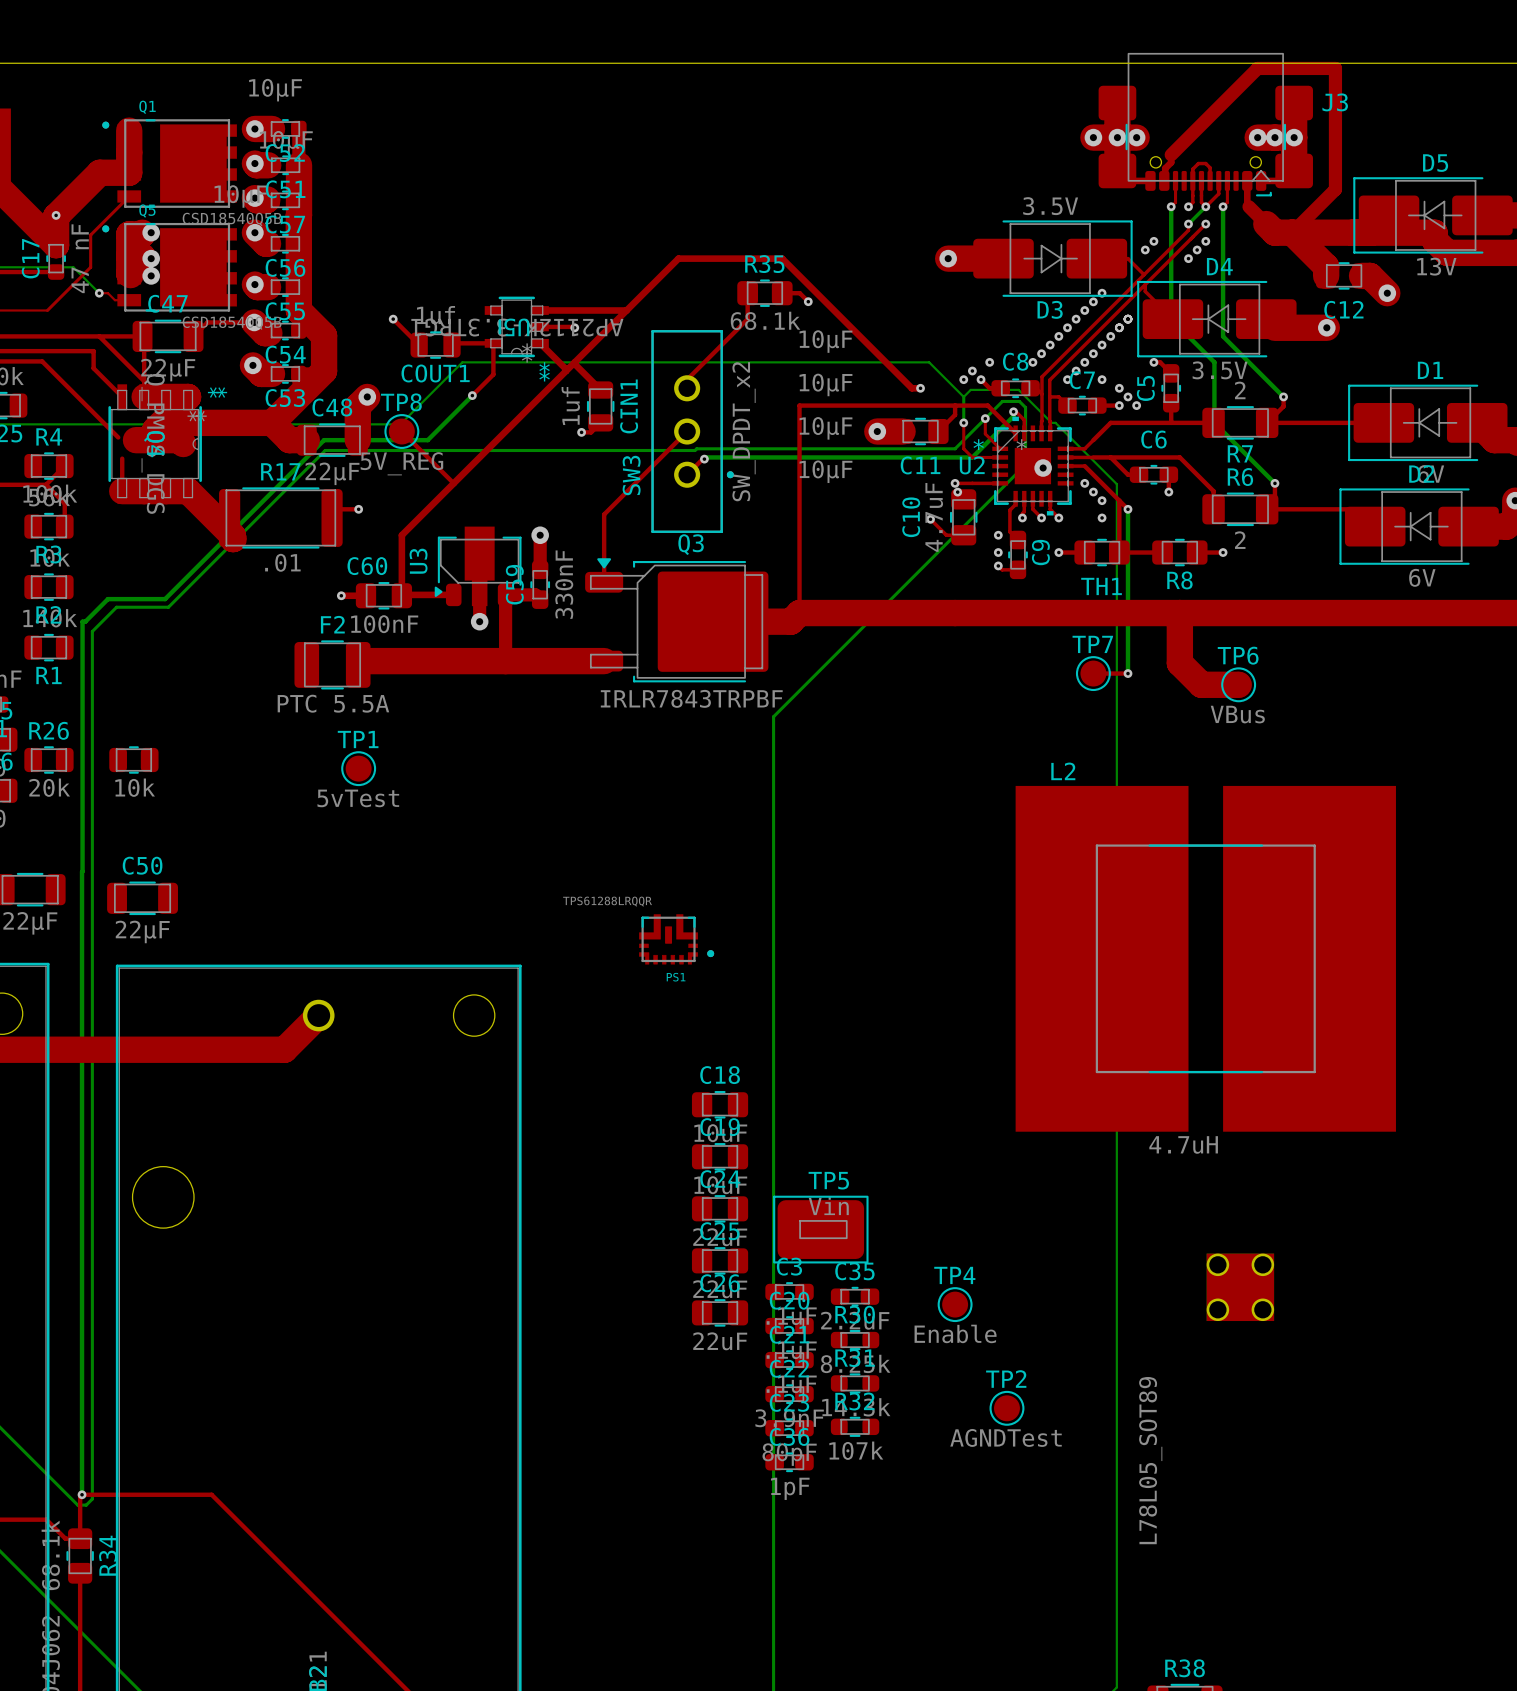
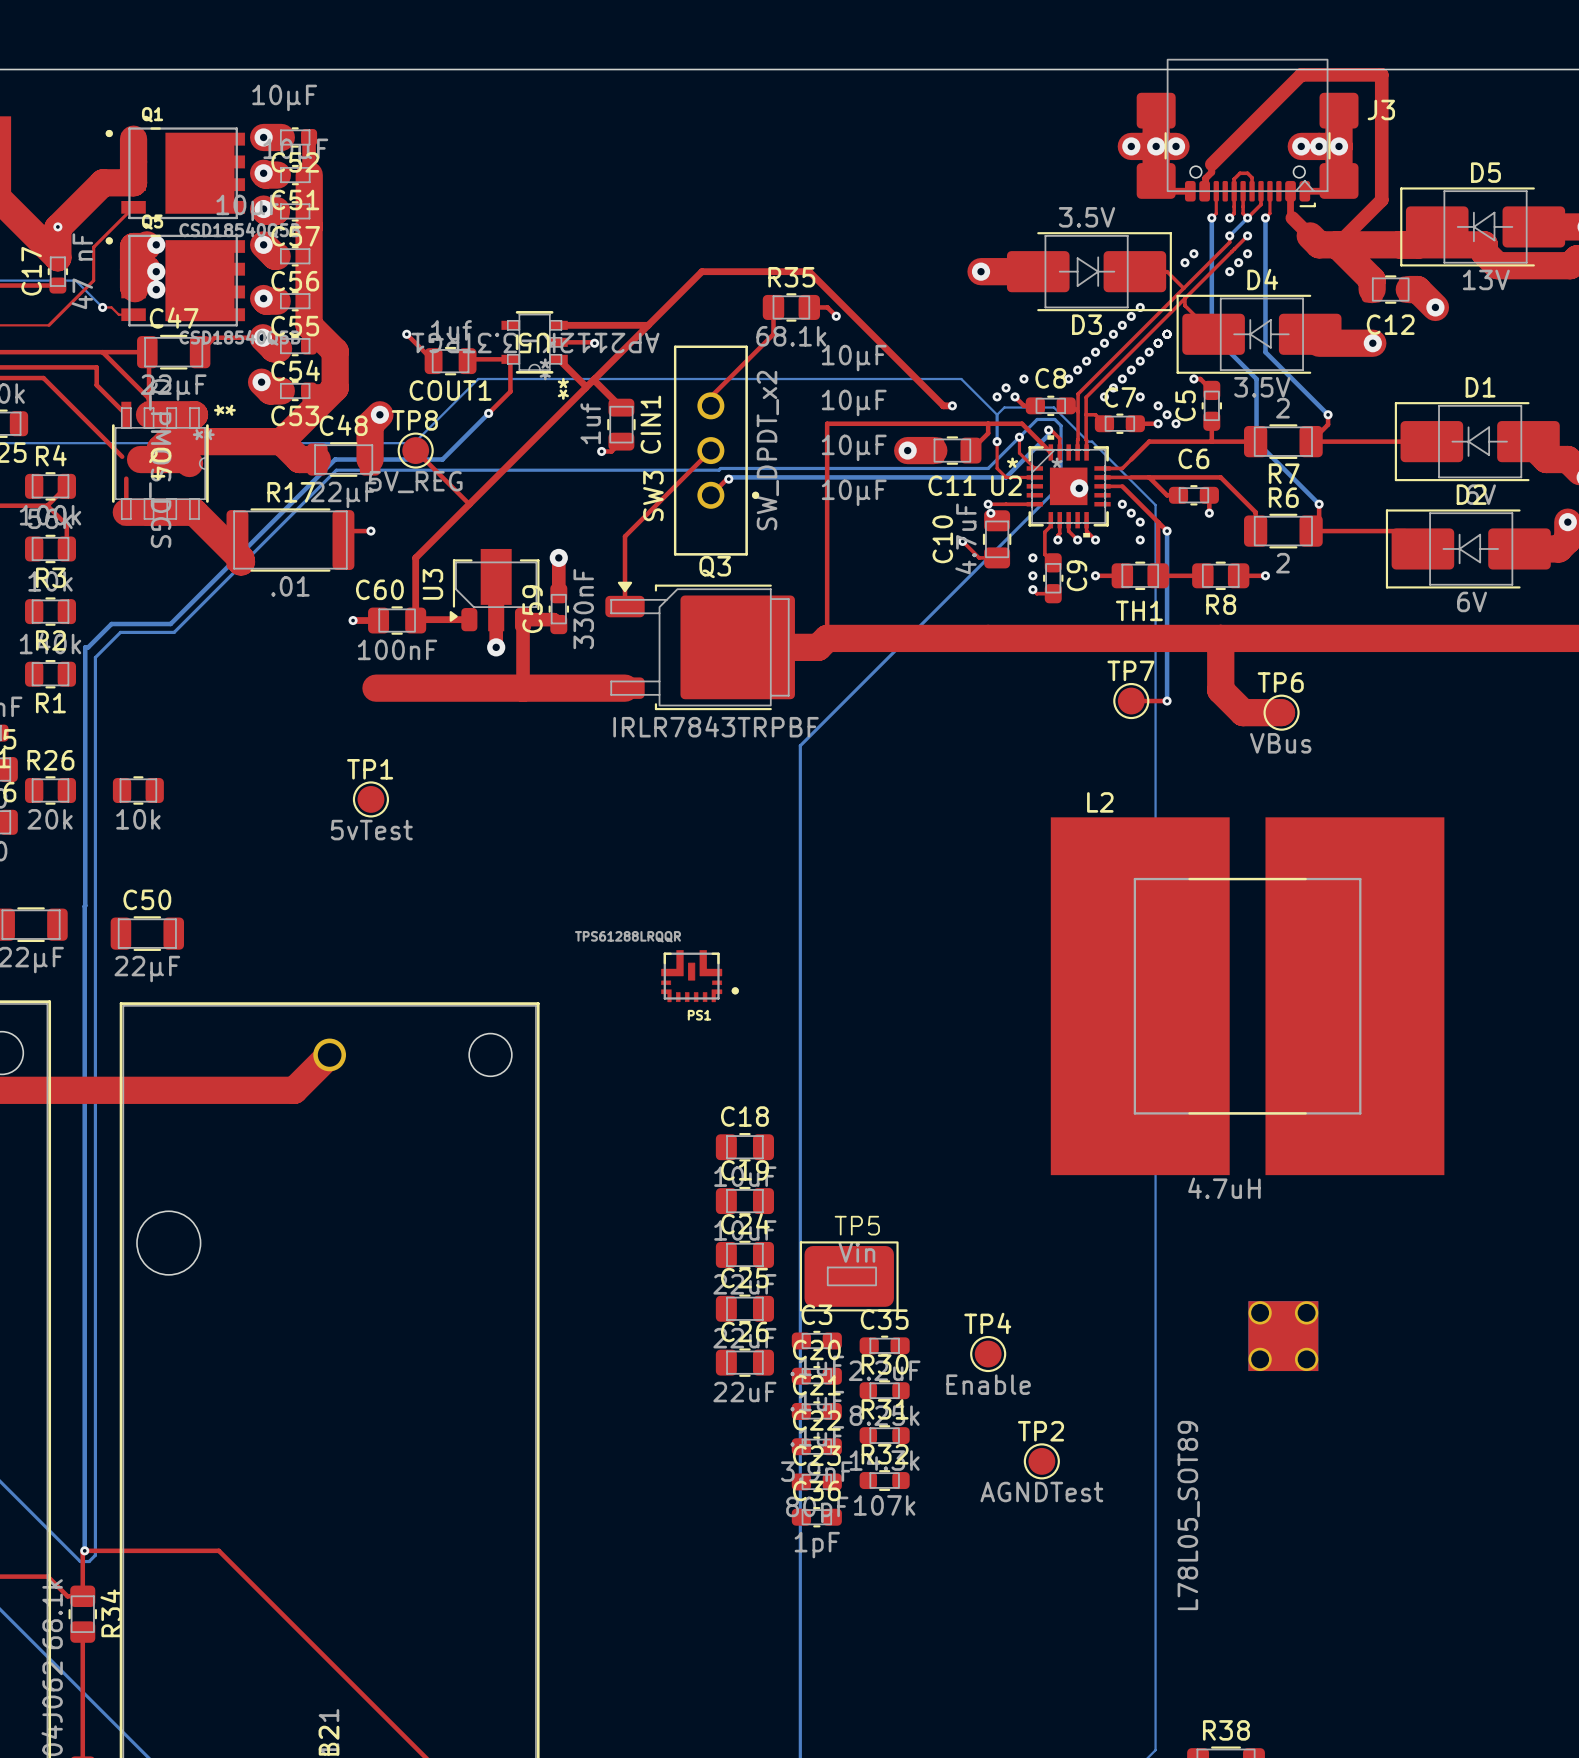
F2: PTC 5.5A (332, 664) -> none

